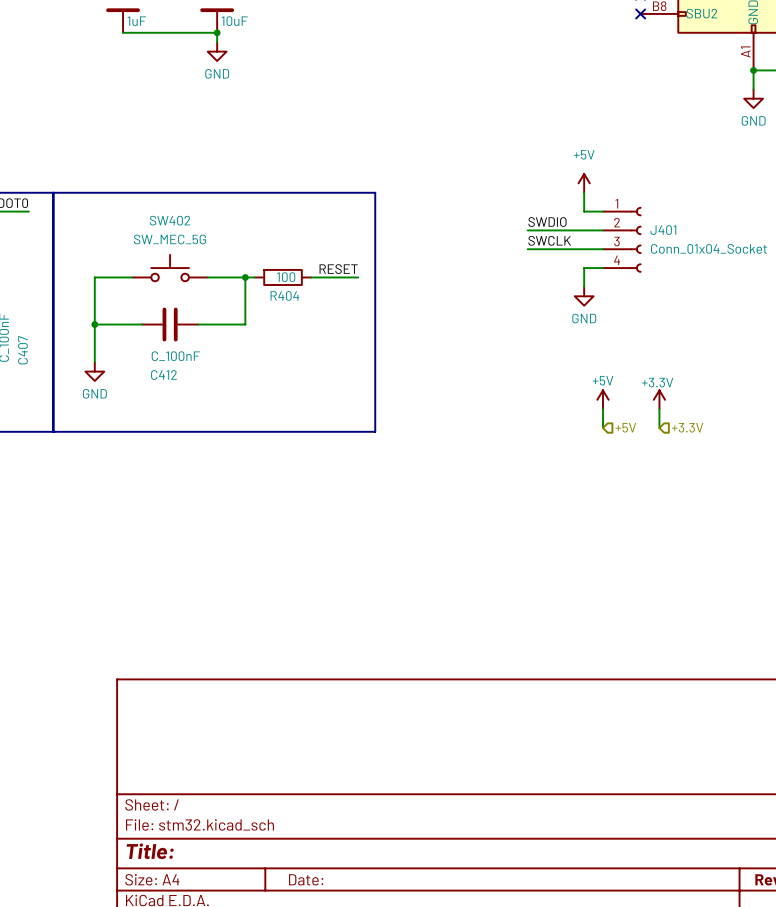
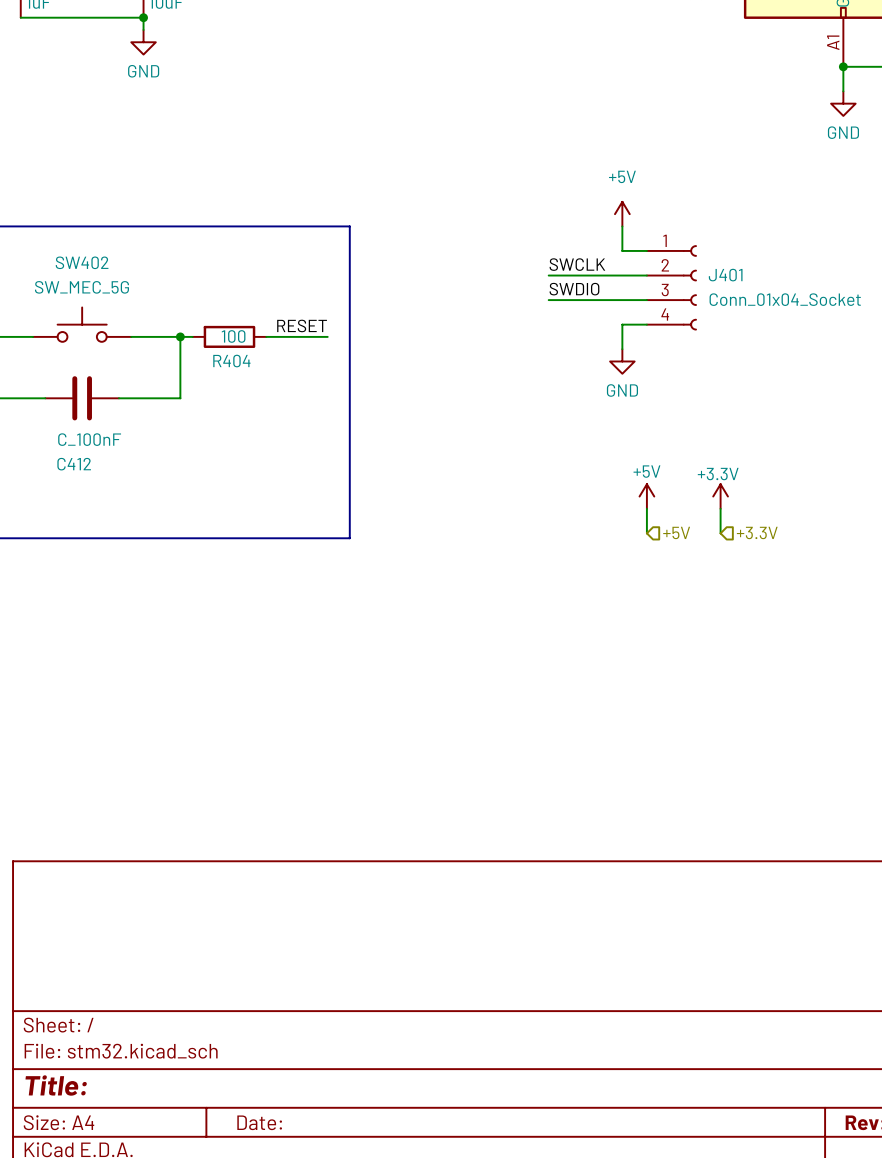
label: SWDIO (547, 222) -> SWCLK (577, 264)
label: SWCLK (549, 240) -> SWDIO (574, 289)

